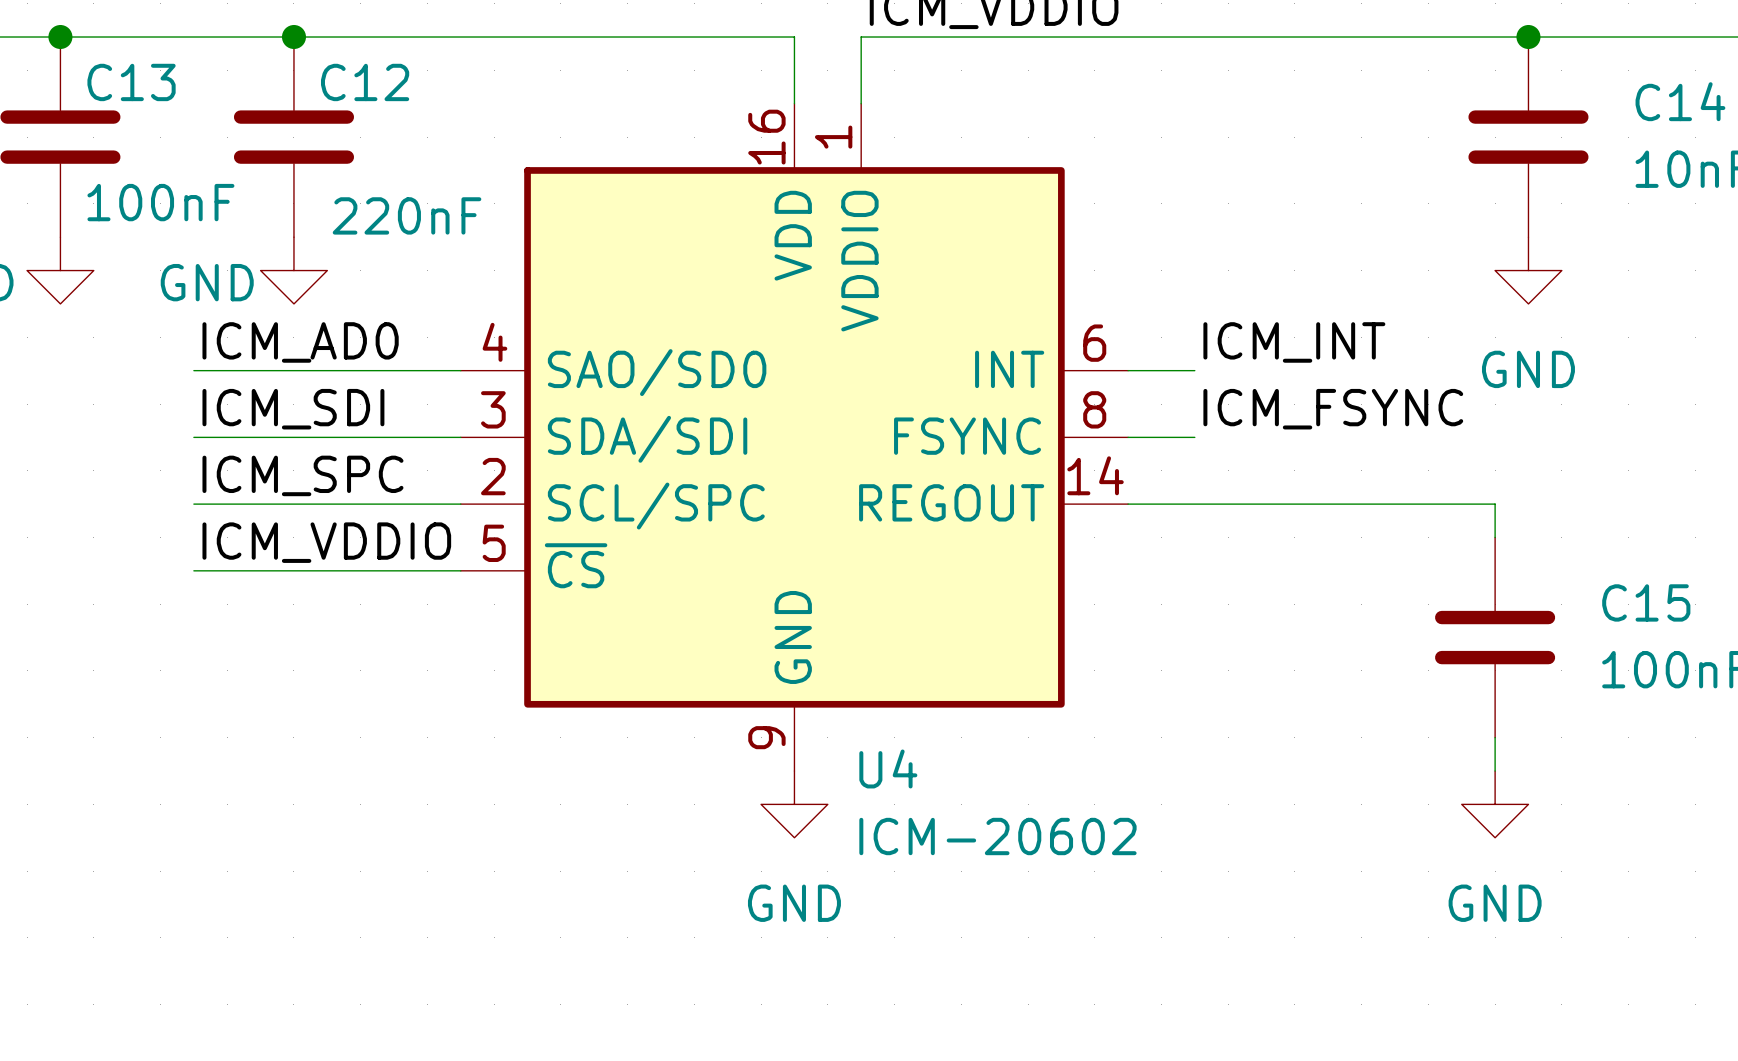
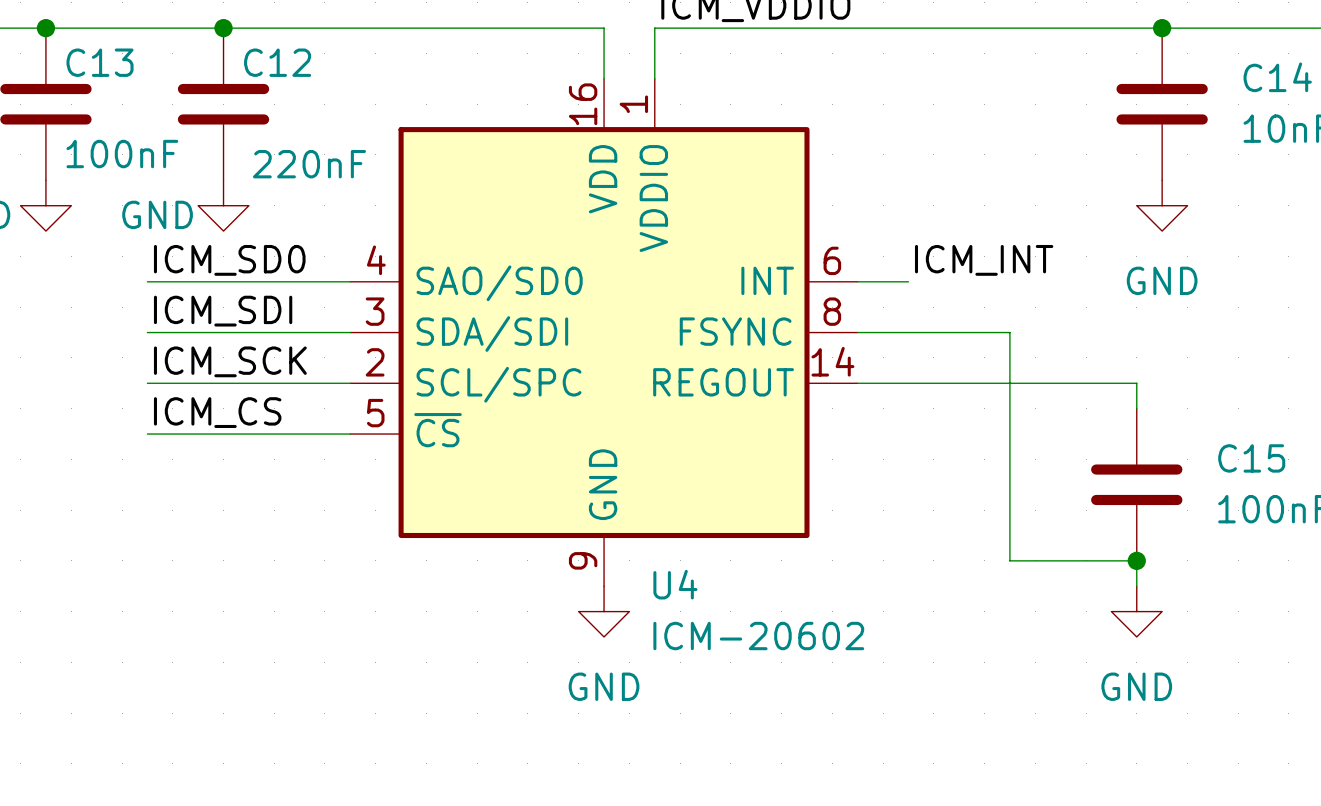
label: ICM_AD0 (300, 342) -> ICM_SD0 (229, 260)
label: ICM_FSYNC (1333, 409) -> none
wire: none -> (908, 332) (1009, 332) (1009, 560) (1136, 560)
label: ICM_SPC (302, 475) -> ICM_SCK (230, 361)
label: ICM_VDDIO (326, 542) -> ICM_CS (217, 412)
junction: none -> (1136, 560)

